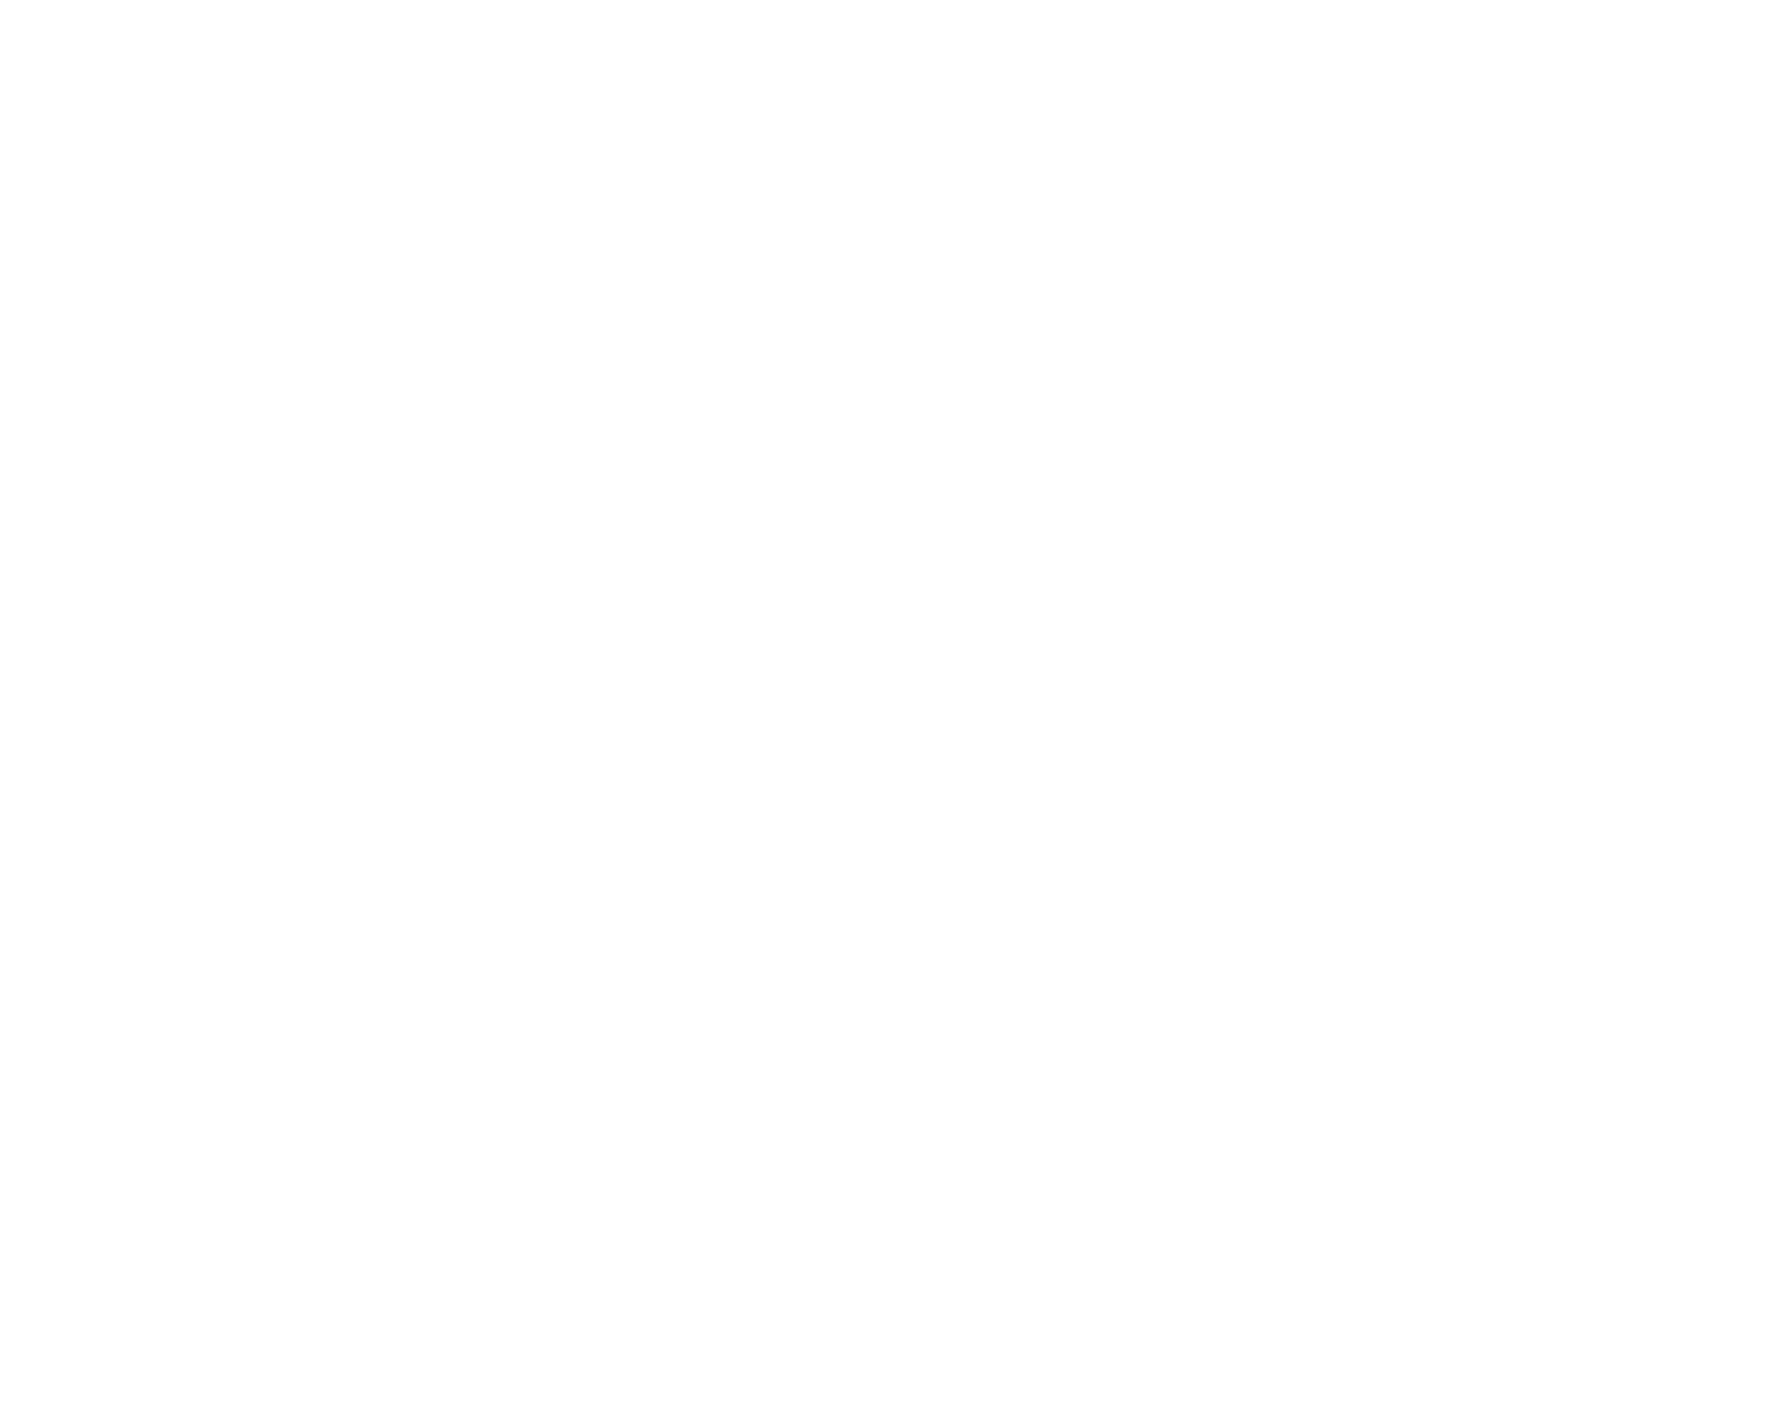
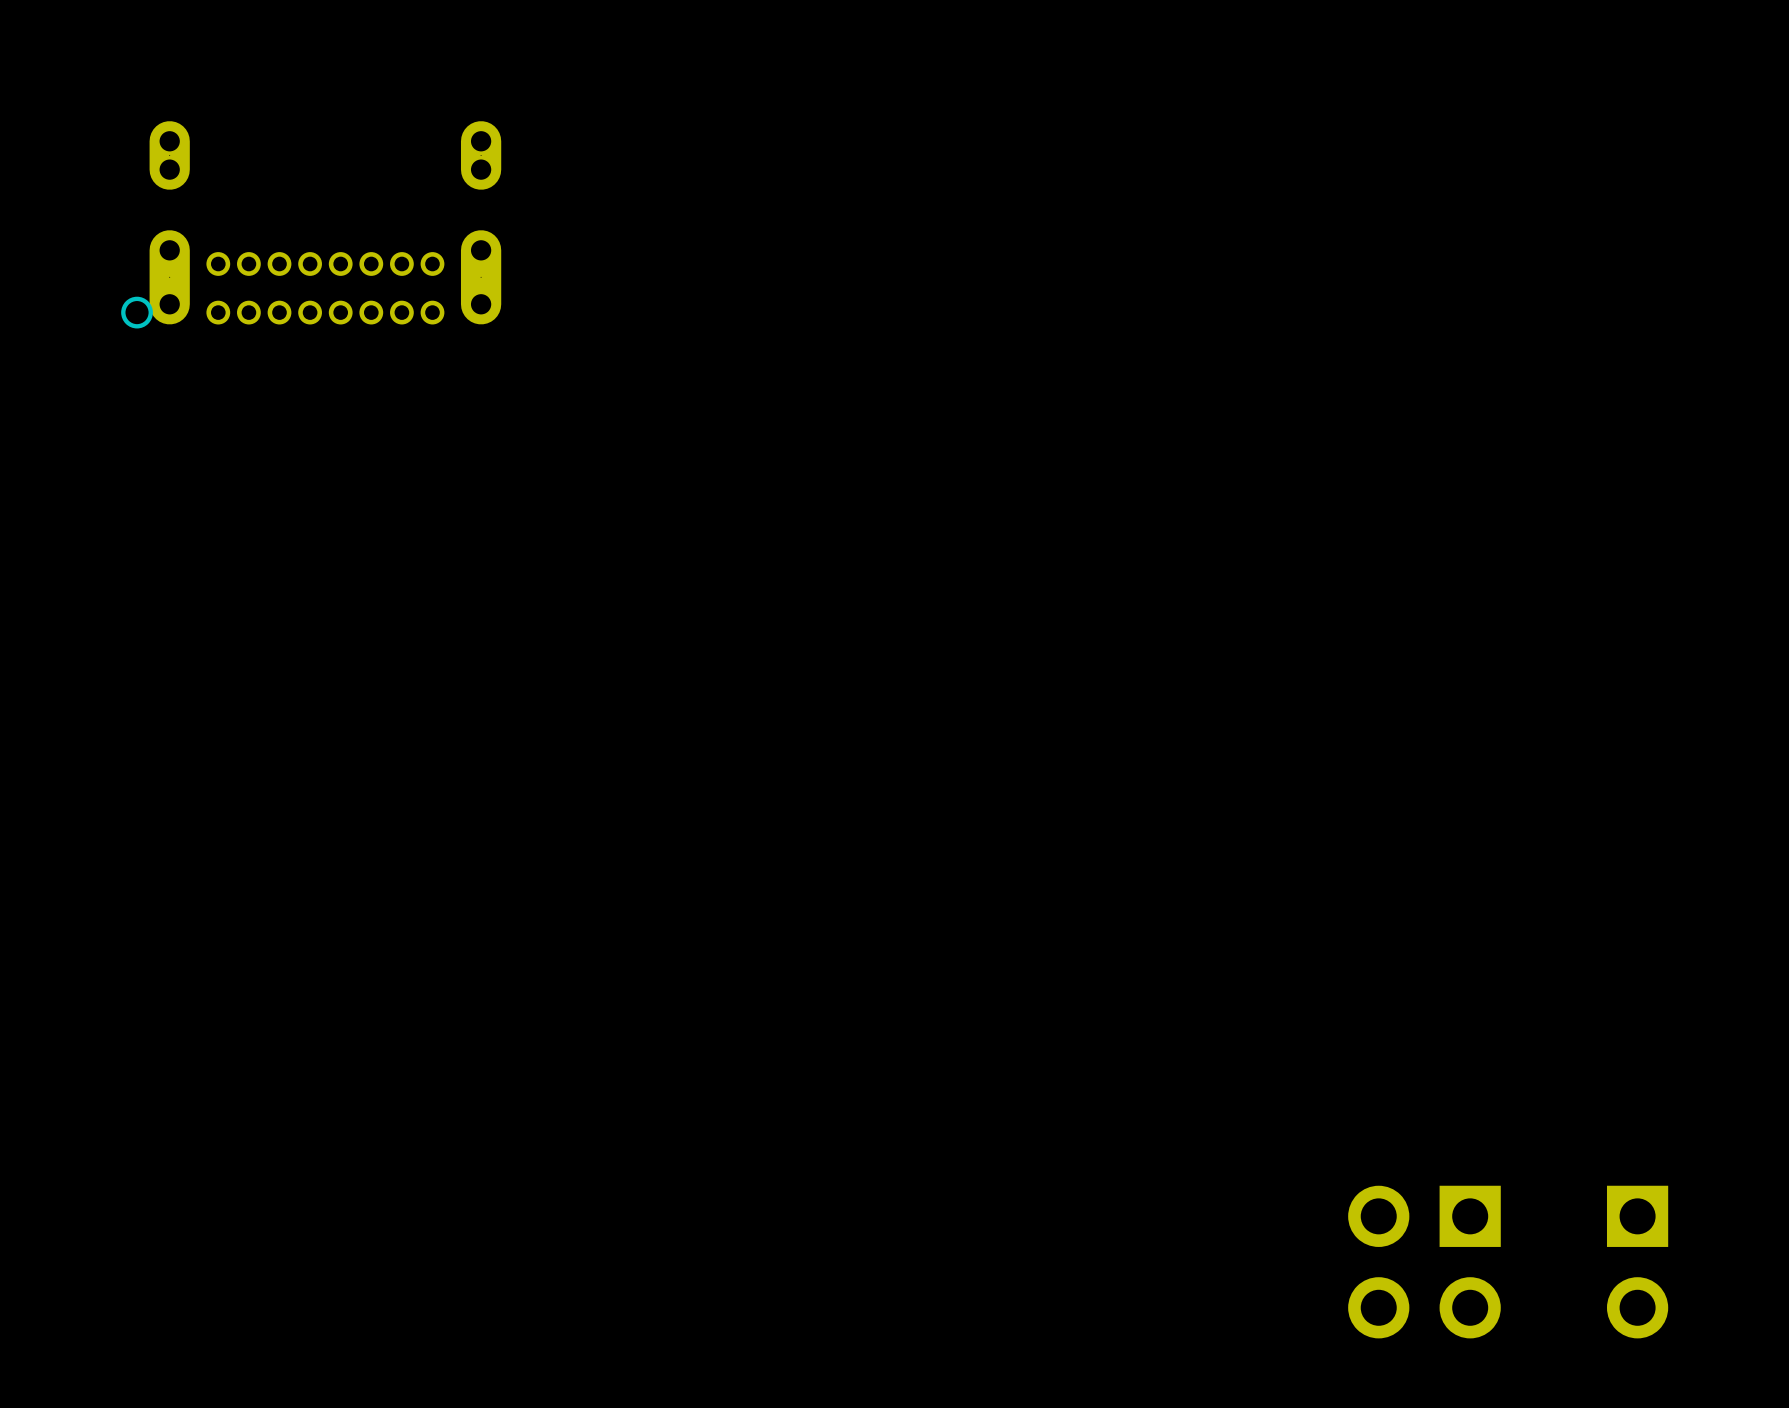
part: none -> (311, 224)
part: none -> (1424, 1262)
part: none -> (1637, 1262)

